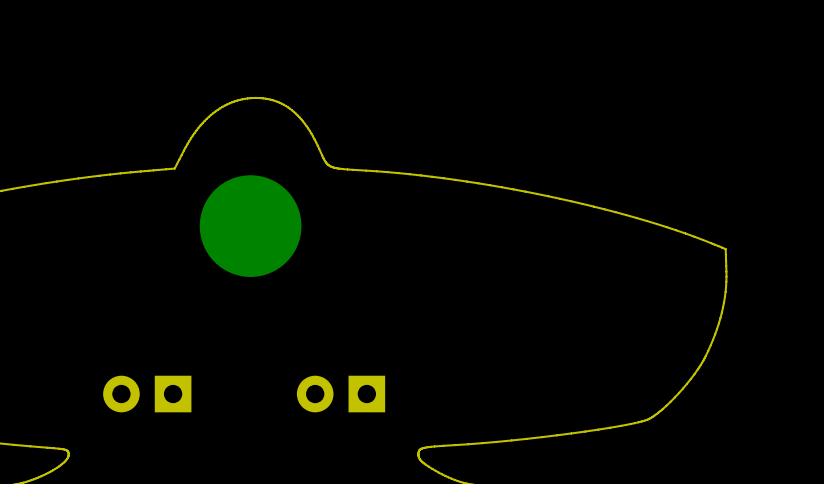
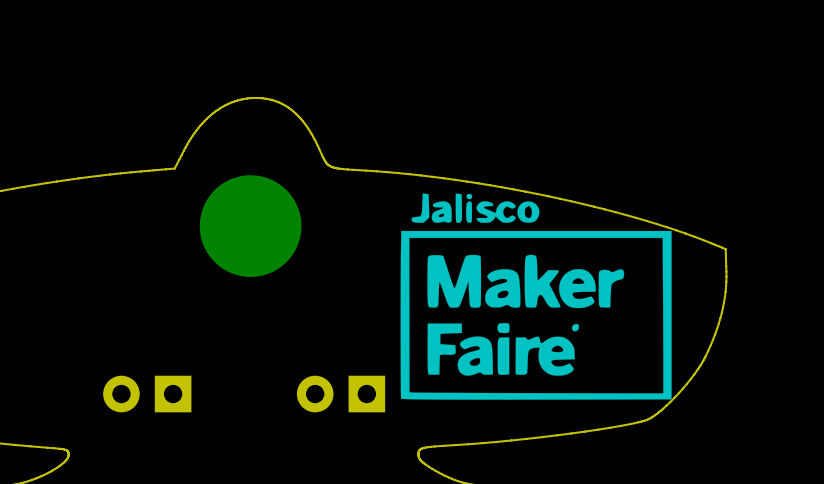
drawing: none -> [400, 193, 672, 400]

